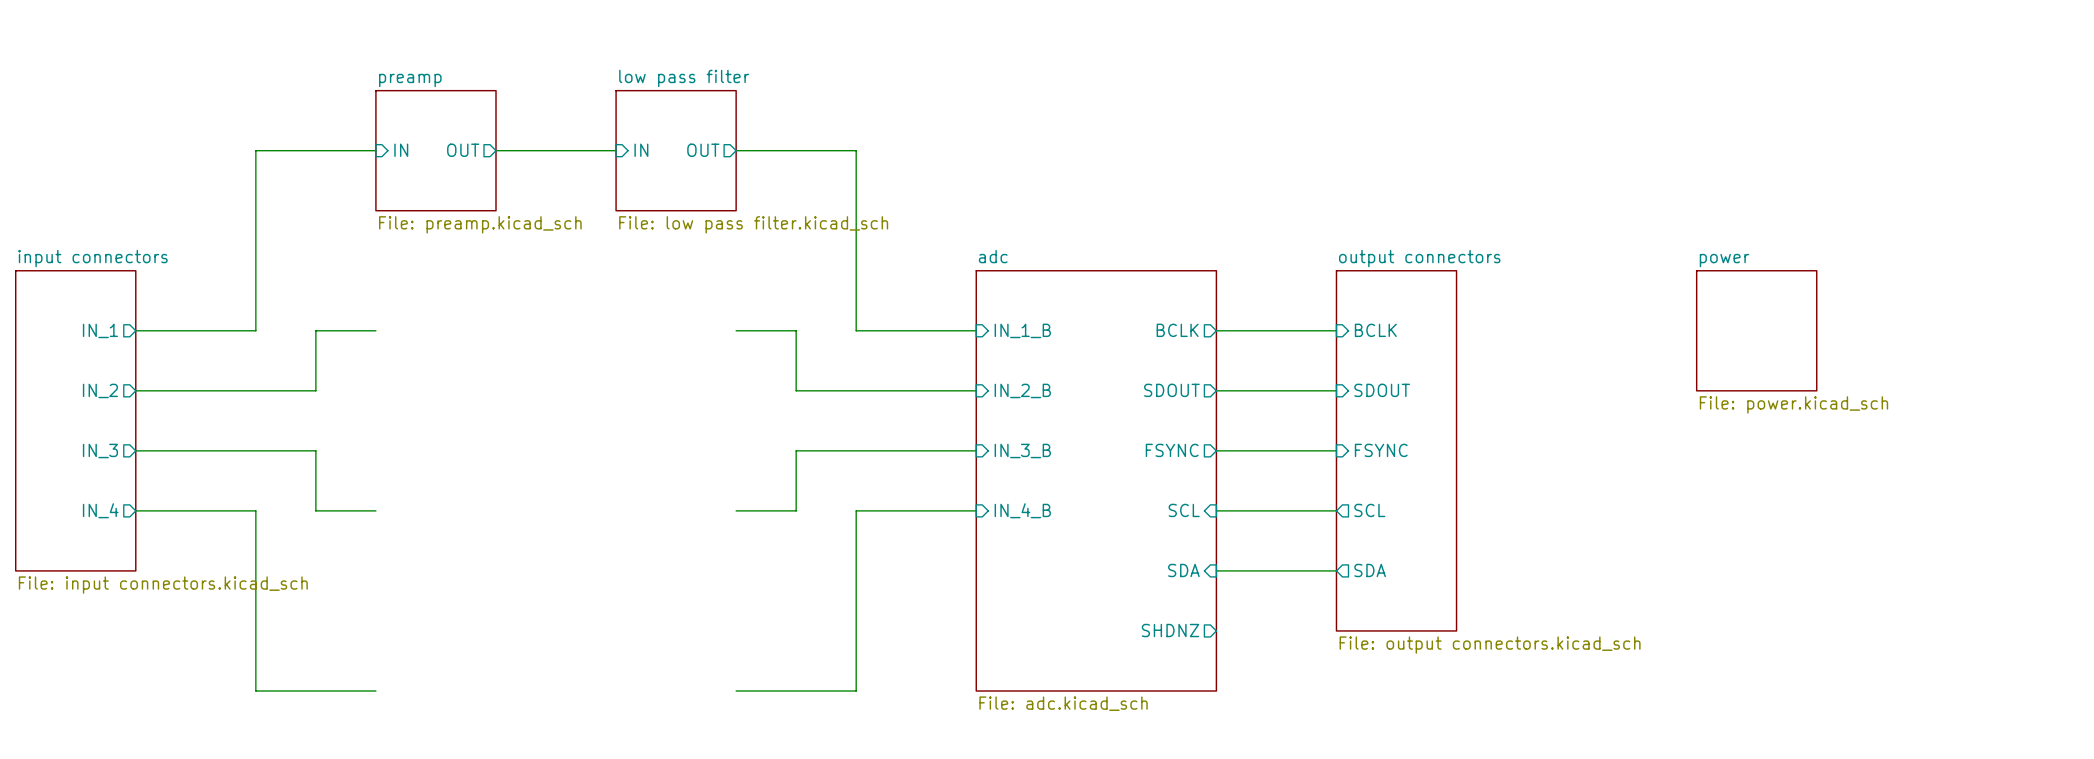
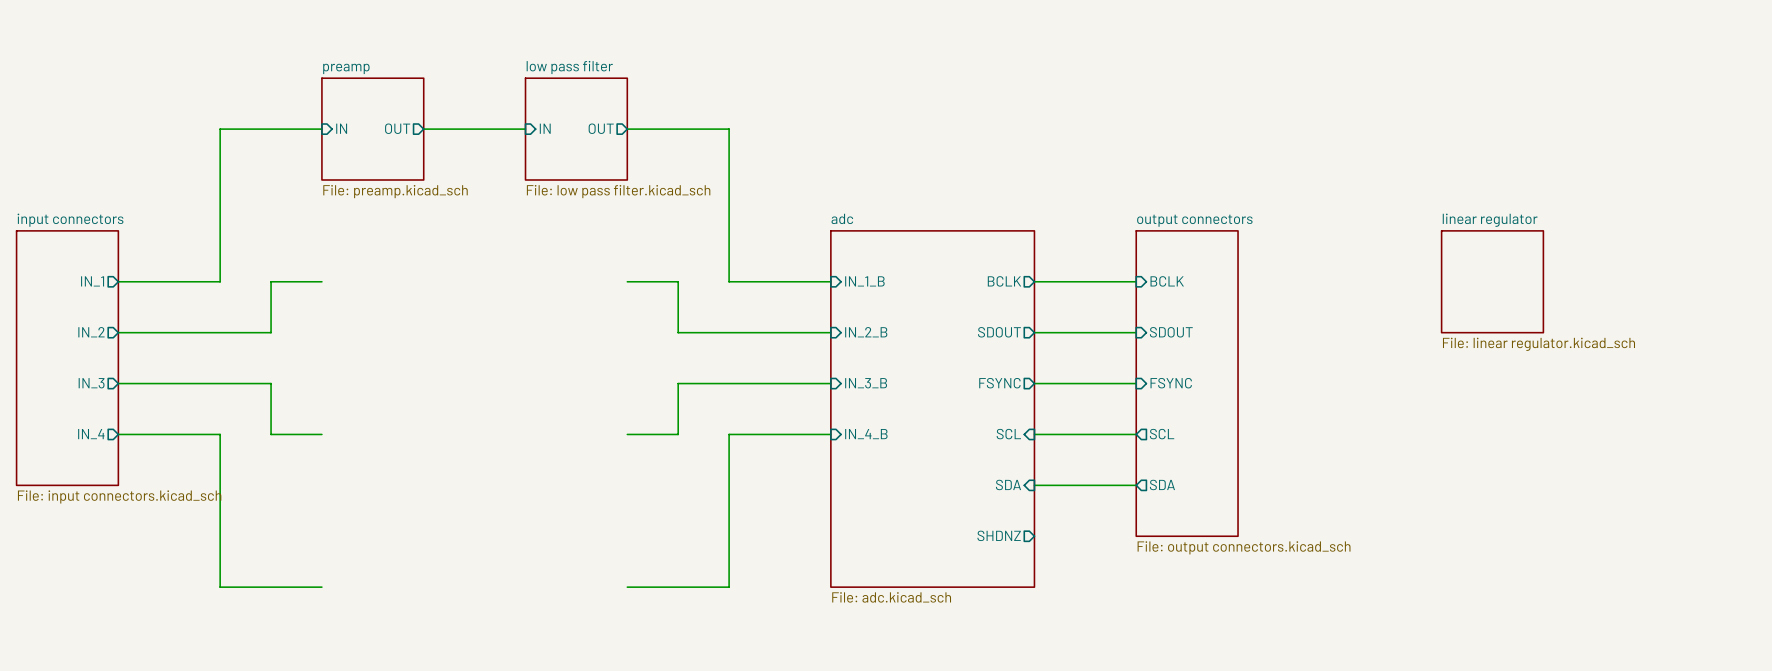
sheet power name: power (1724, 260) -> linear regulator (1490, 220)
sheet power value: File: power.kicad_sch (1793, 404) -> File: linear regulator.kicad_sch (1538, 344)

